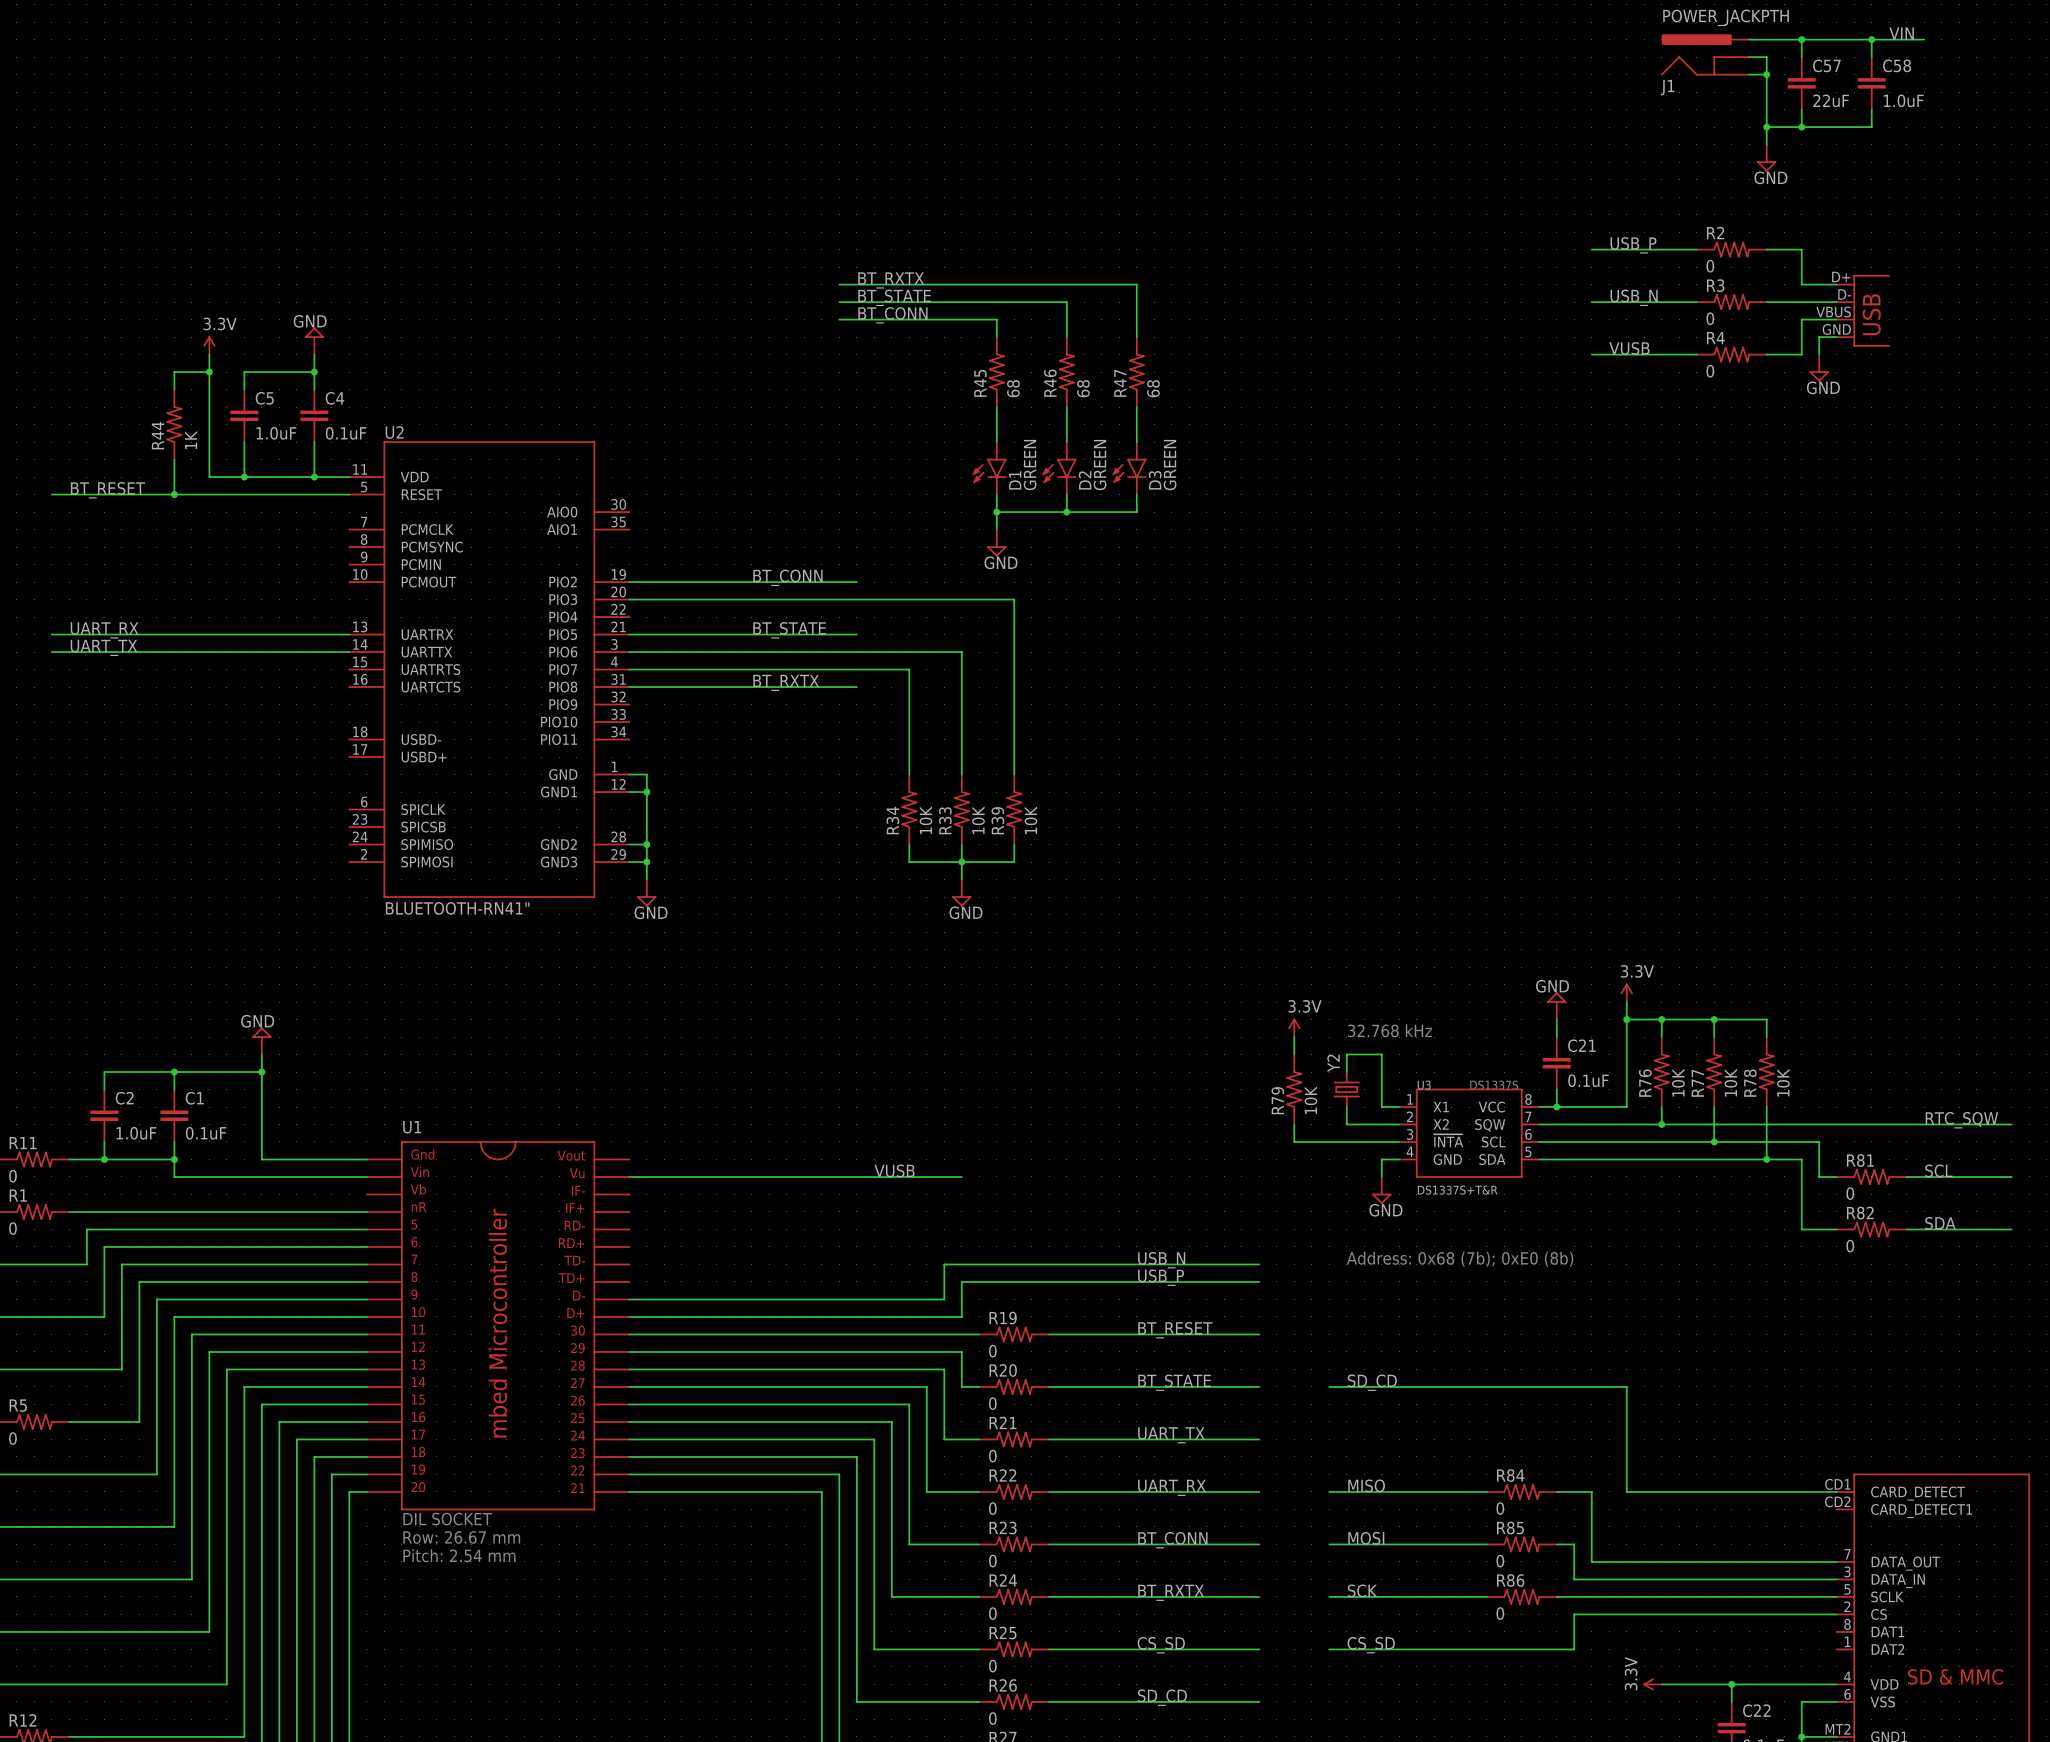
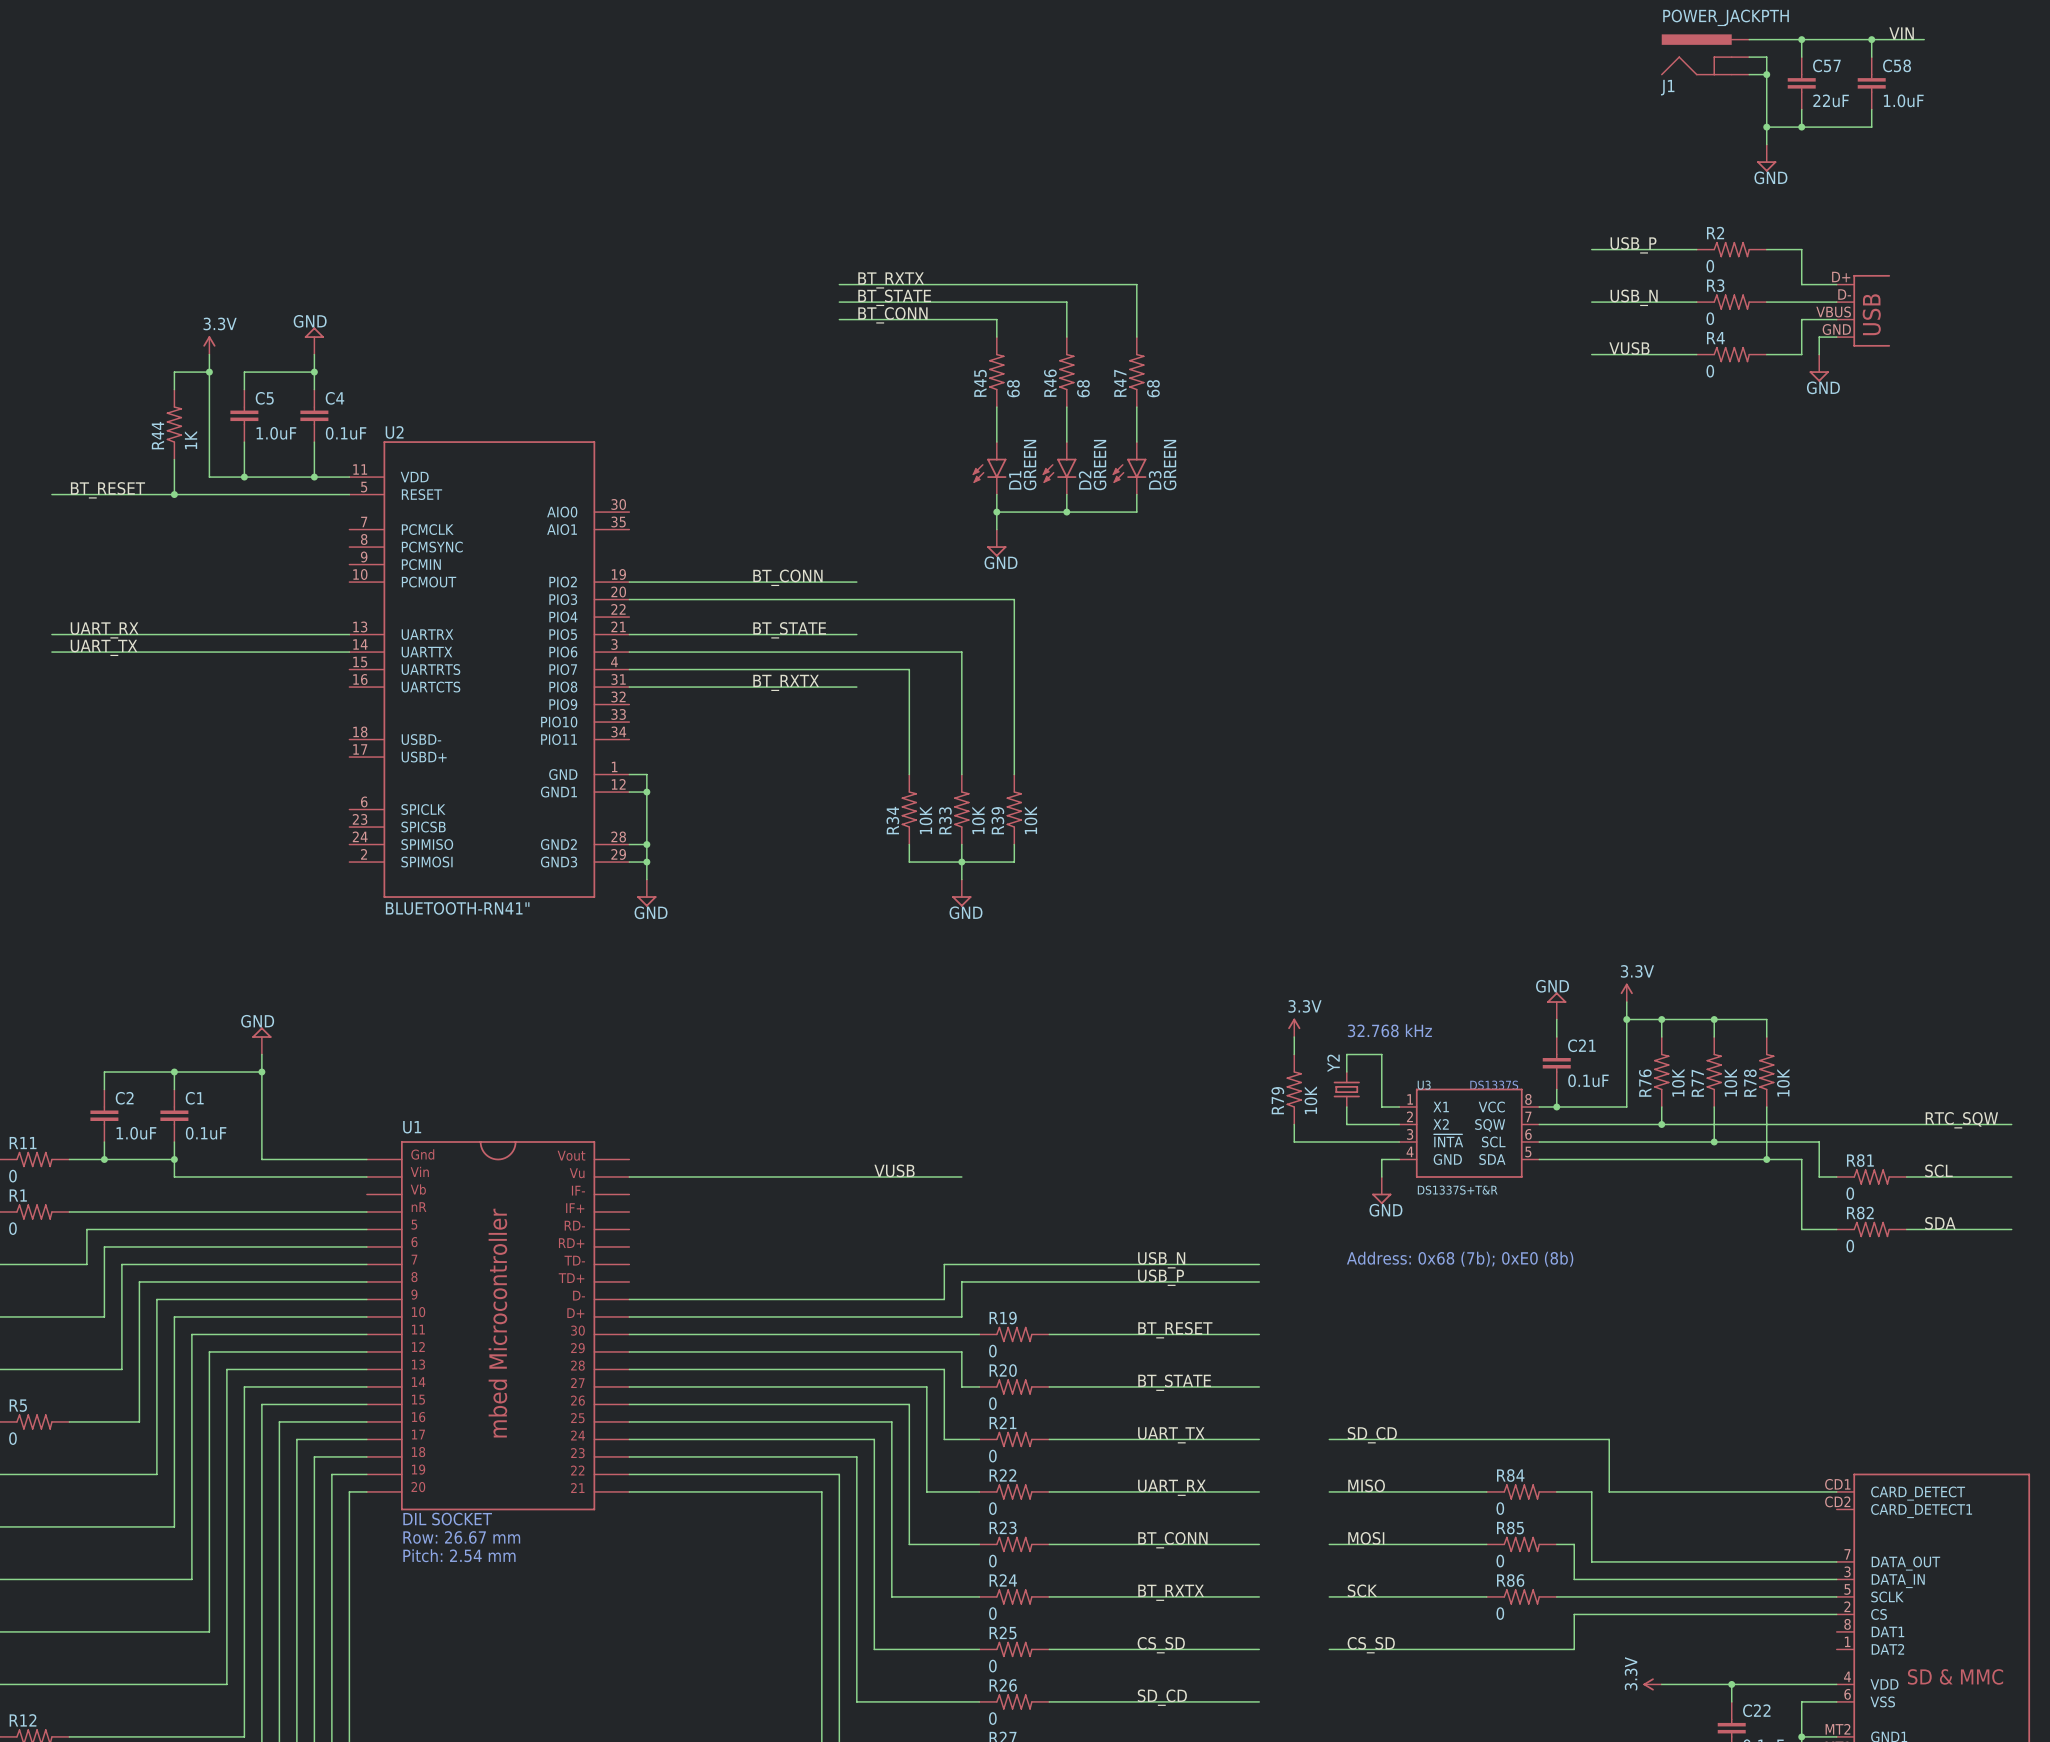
label position: SD_CD (1372, 1382) -> SD_CD (1372, 1435)
wire: (1329, 1386) (1626, 1386) (1626, 1491) -> (1329, 1439) (1609, 1439) (1609, 1491) (1626, 1491)

